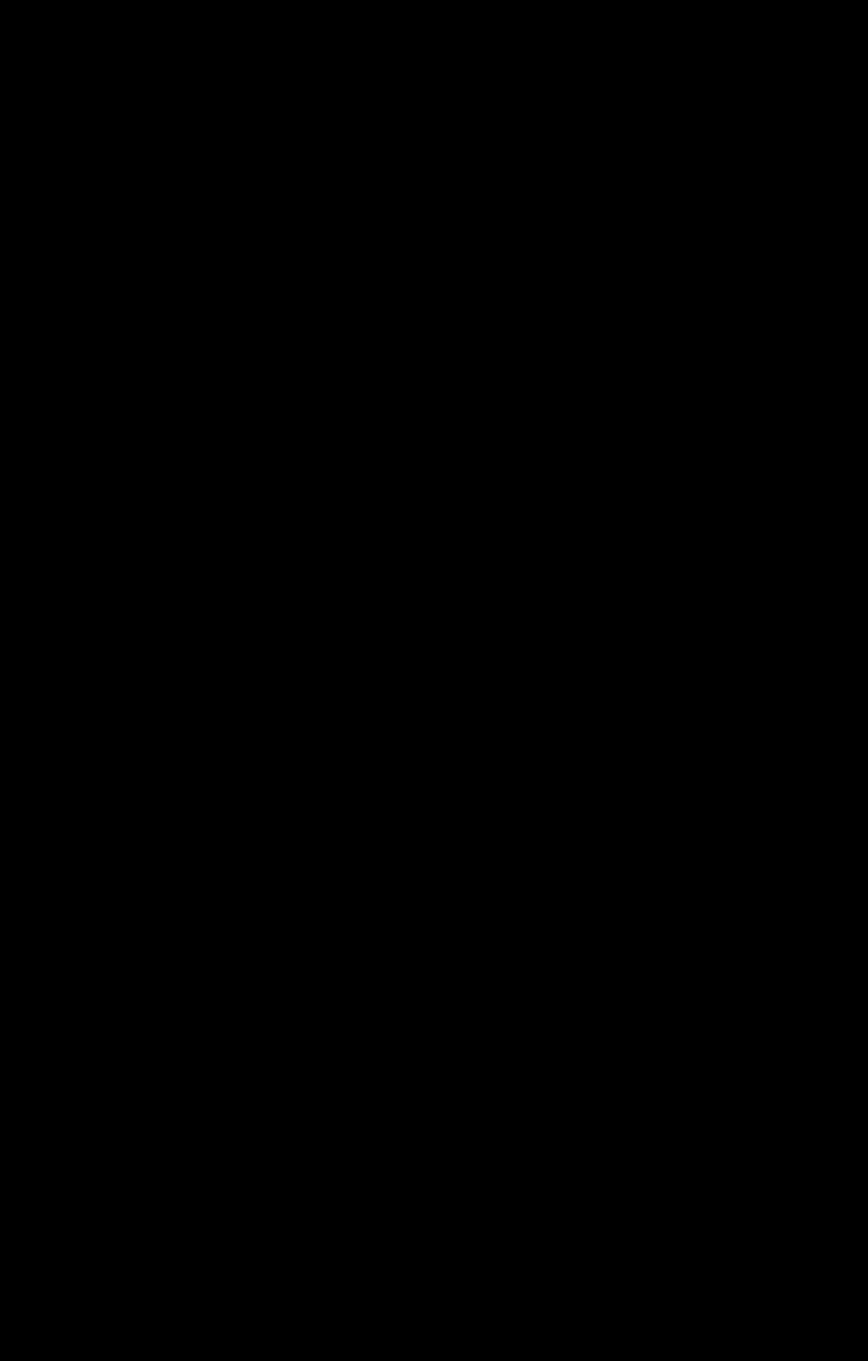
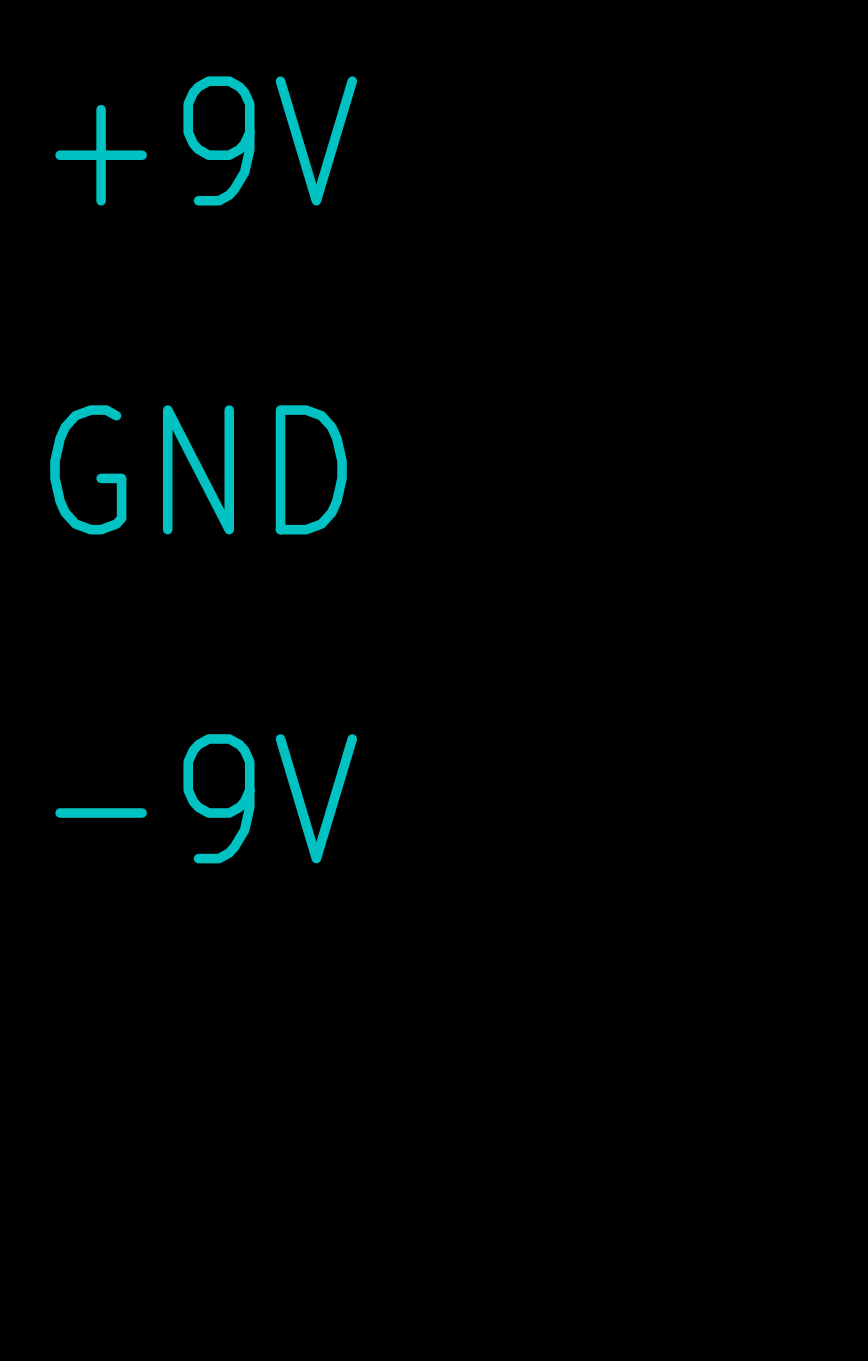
text: none -> +9V (206, 140)
text: none -> GND (198, 469)
text: none -> -9V (206, 798)

